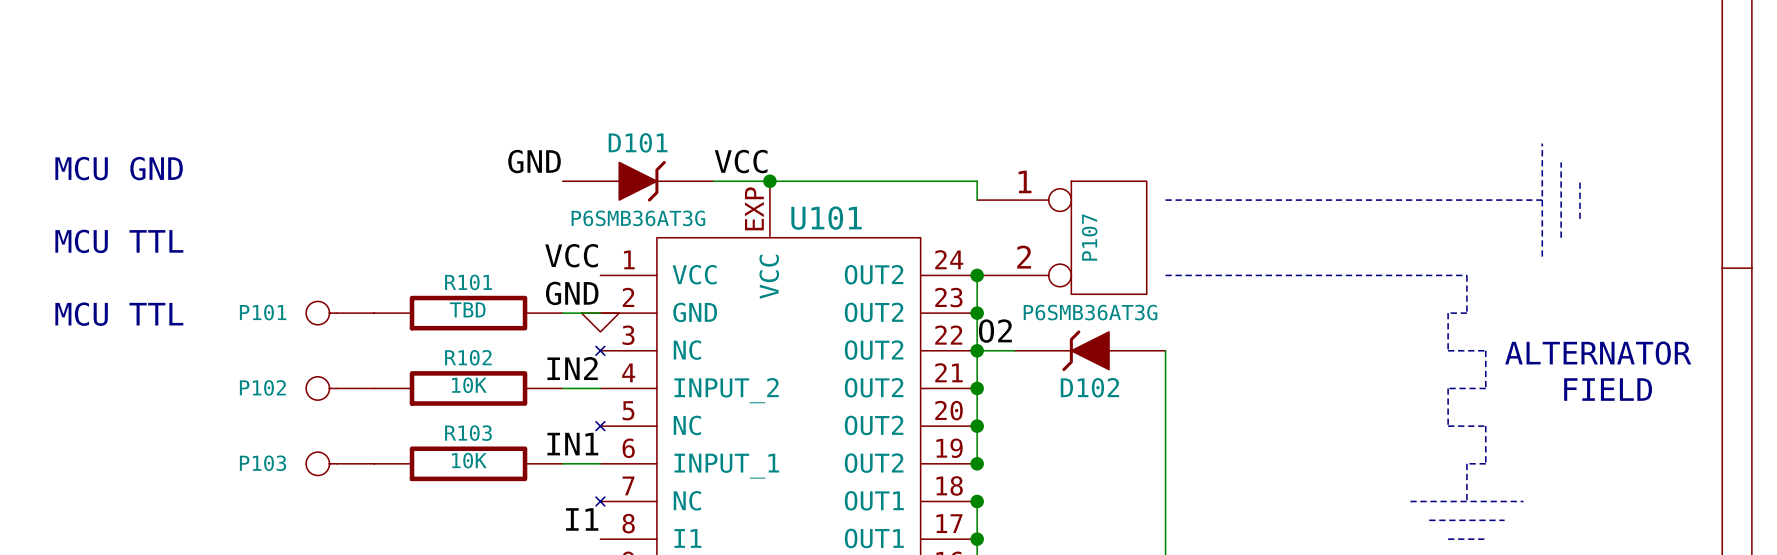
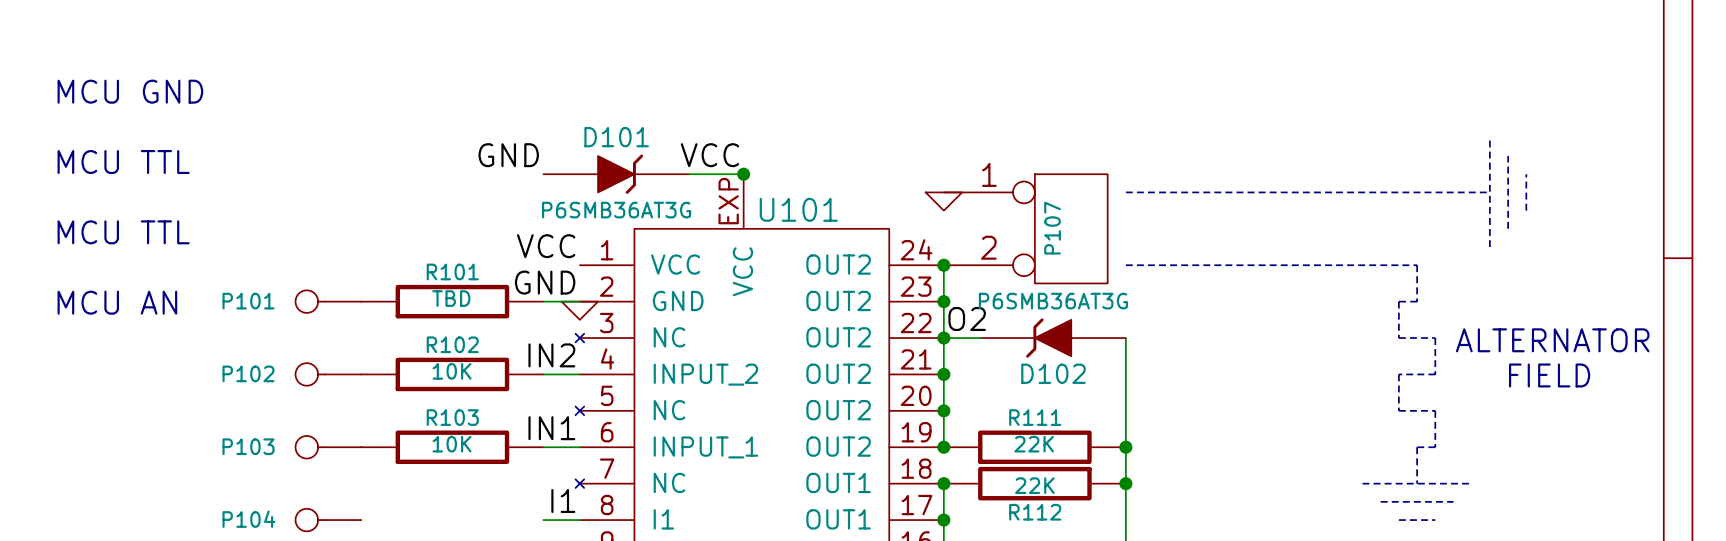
text: none -> MCU GND (130, 91)
text: MCU GND (119, 168) -> MCU TTL (123, 162)
wire: (769, 181) (977, 181) (977, 200) -> none
power symbol: none -> (943, 201)
text: MCU TTL (119, 314) -> MCU AN (117, 302)
R111: none -> 22K (1034, 447)
junction: none -> (1125, 447)
R112: none -> 22K (1034, 483)
junction: none -> (1125, 483)
P104: none -> (328, 520)
wire: none -> (543, 520) (579, 520)

